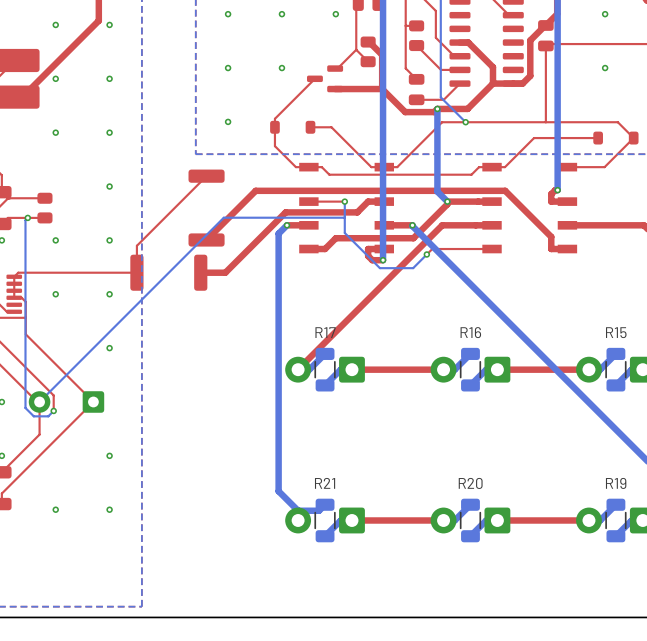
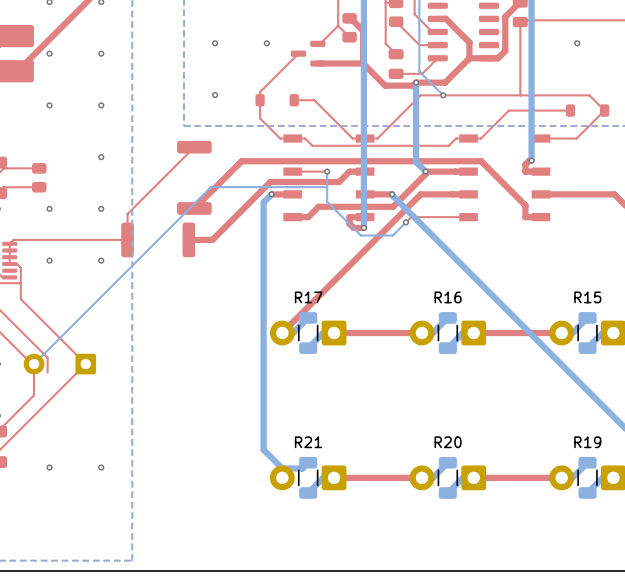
bottom track: (27, 217) (25, 220) (25, 408) (33, 416) (48, 416) (53, 410) -> none
via: (27, 217) -> none
via: (109, 348) -> none
via: (53, 410) -> none
via: (109, 455) -> none

